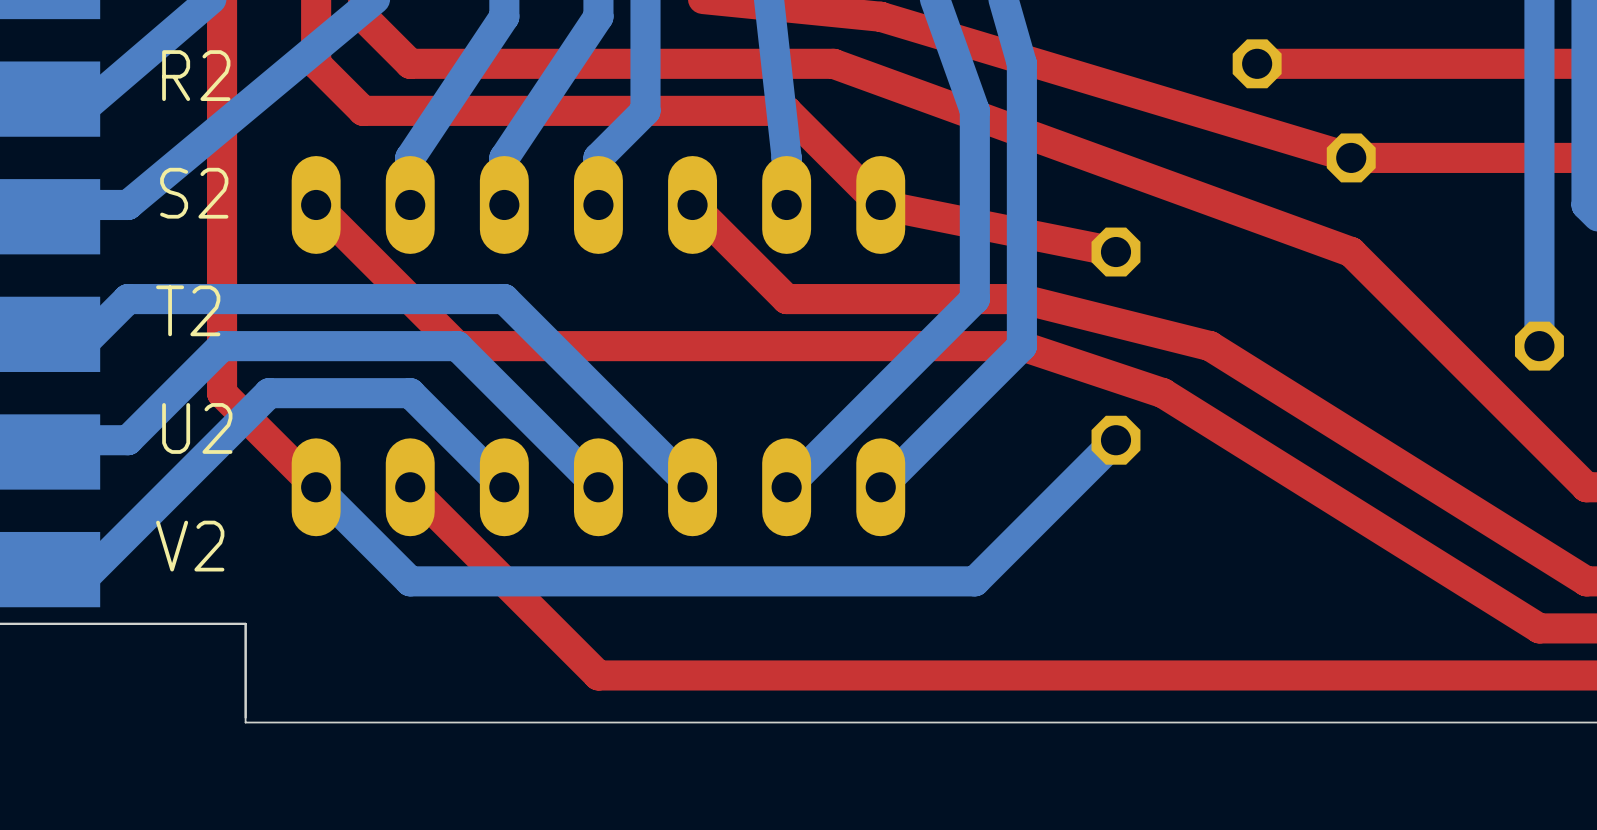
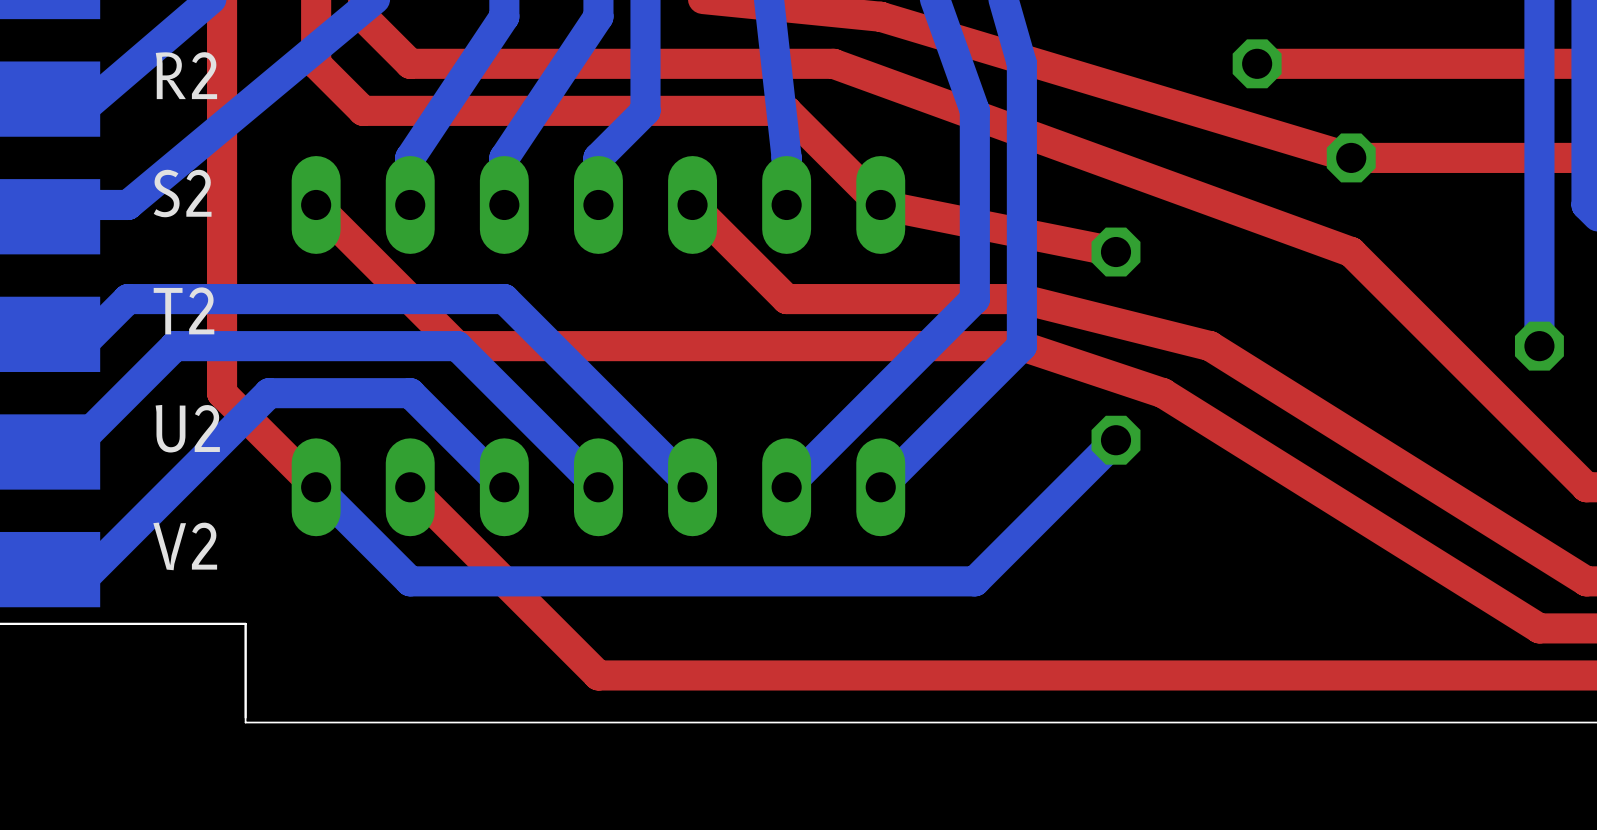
bottom track: (222, 346) (127, 440) (80, 440) -> (222, 346) (174, 346) (80, 440)

